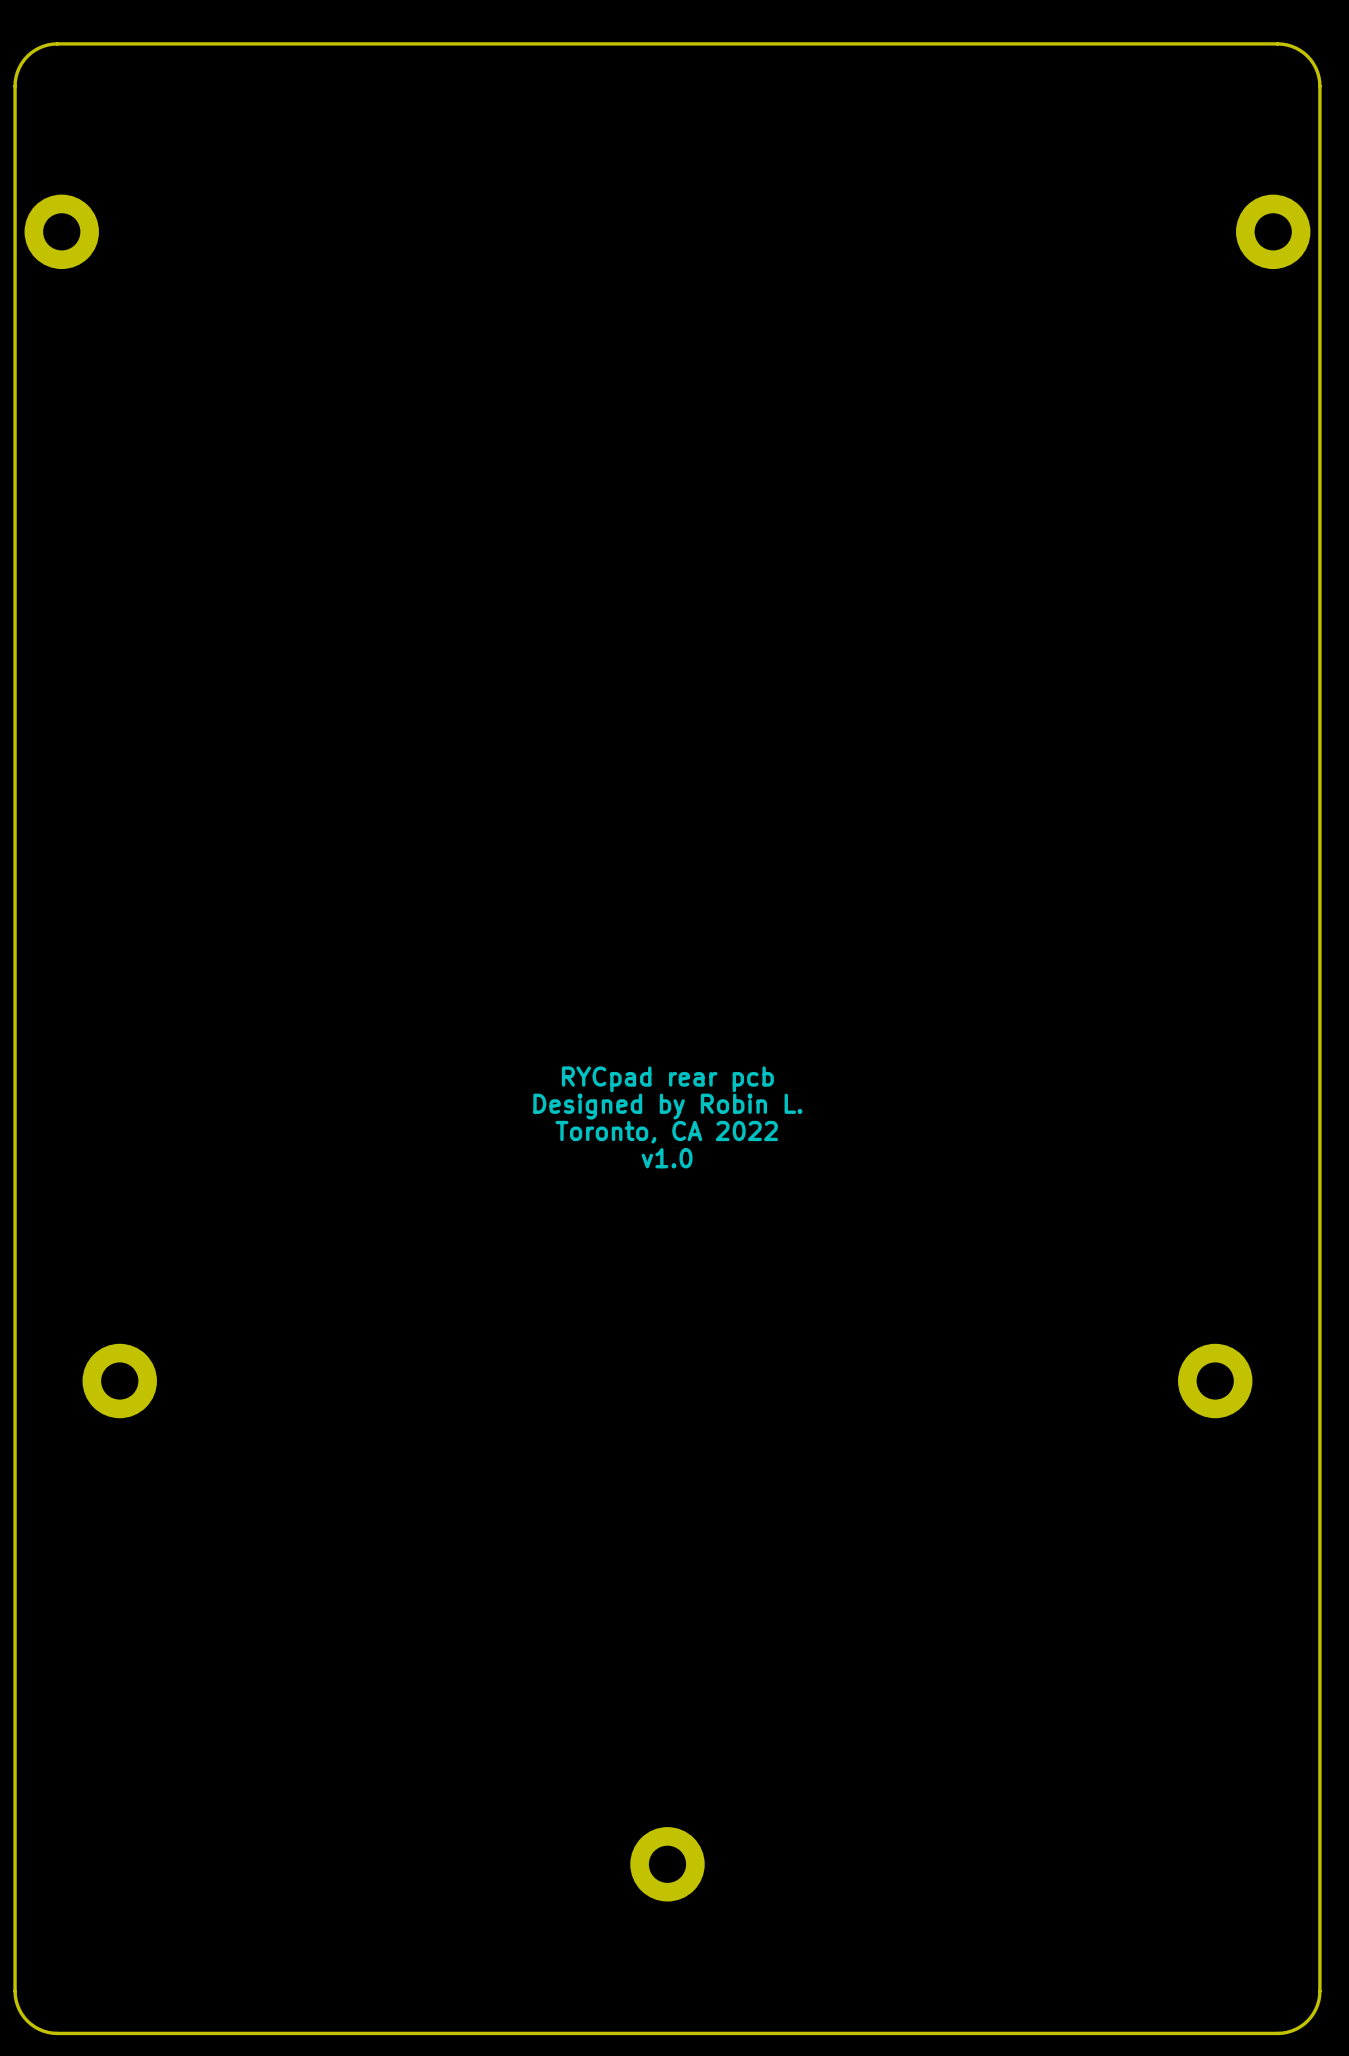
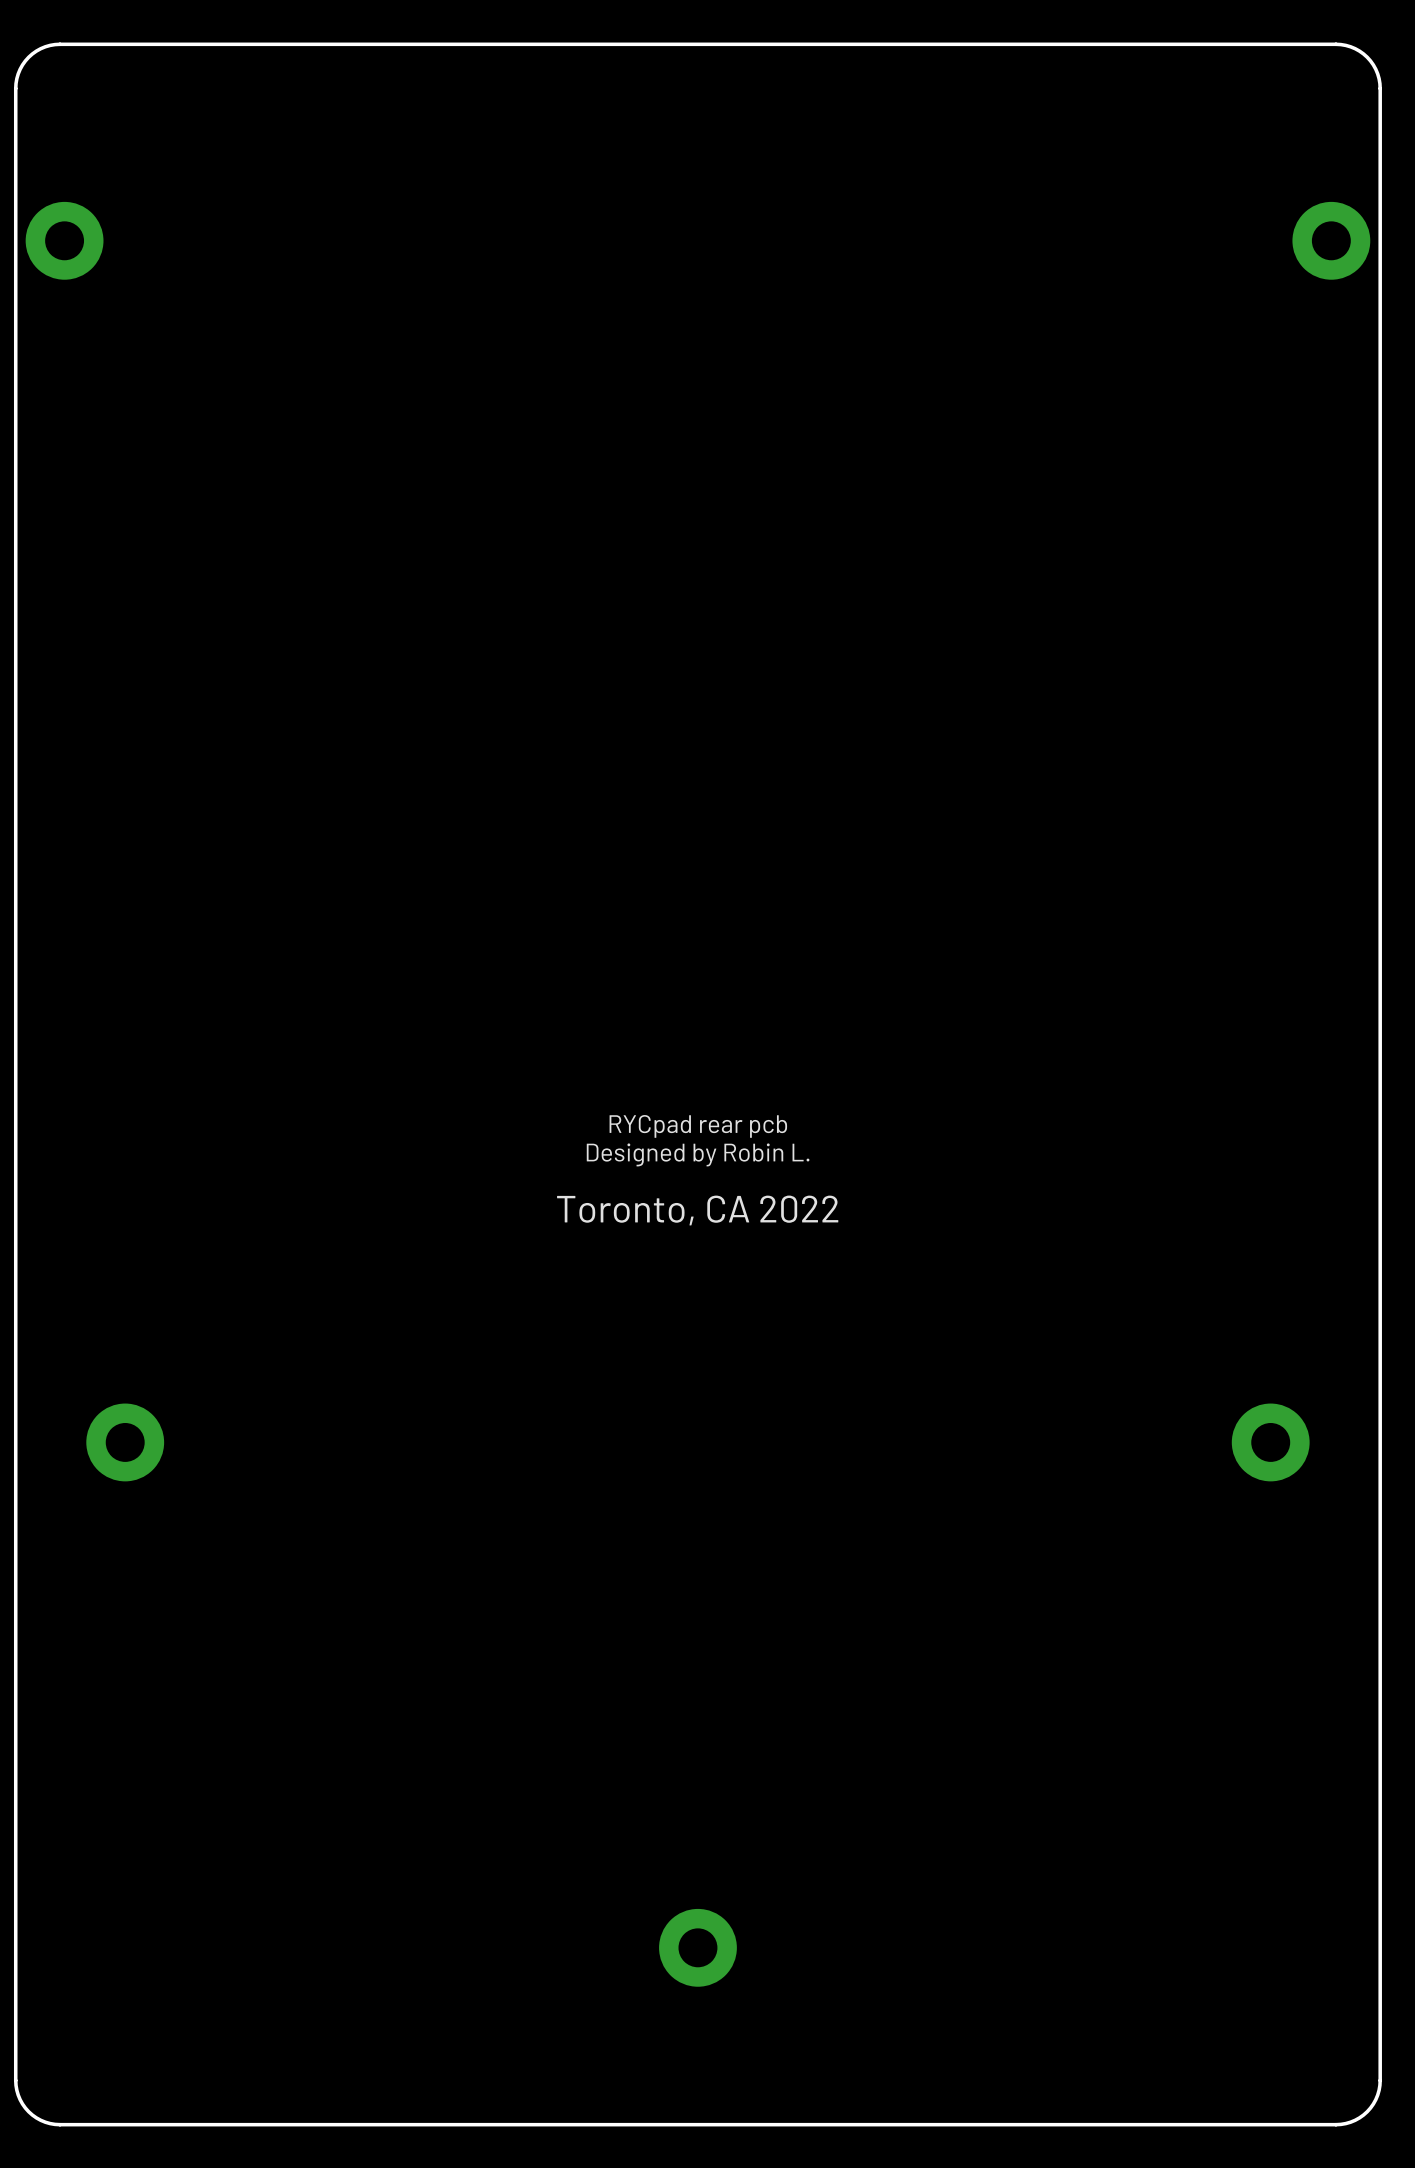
text: Toronto, CA 2022 (666, 1132) -> none
text: v1.0 (667, 1158) -> Toronto, CA 2022 (697, 1210)

